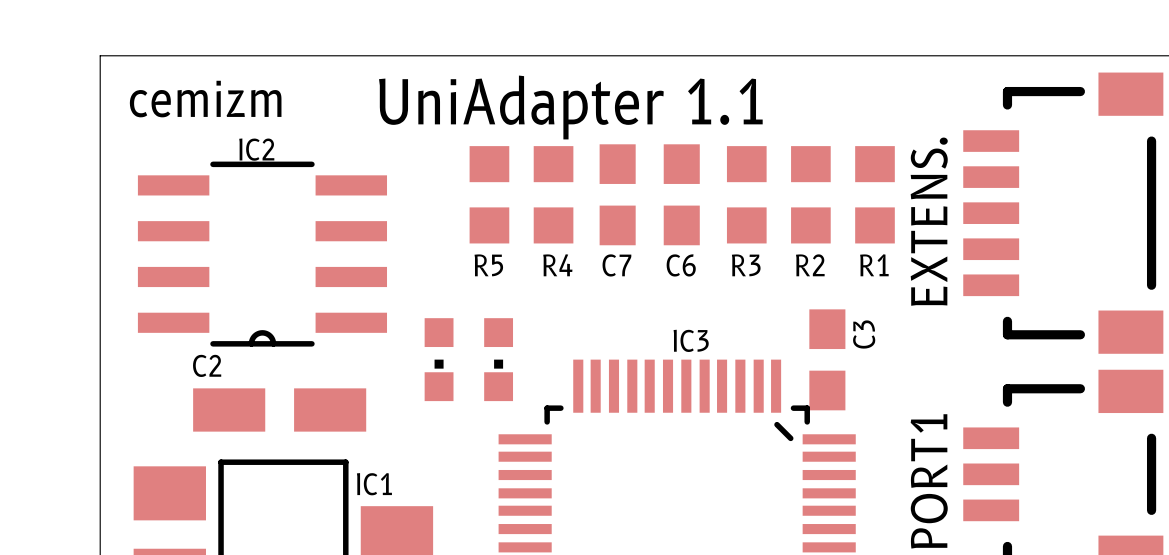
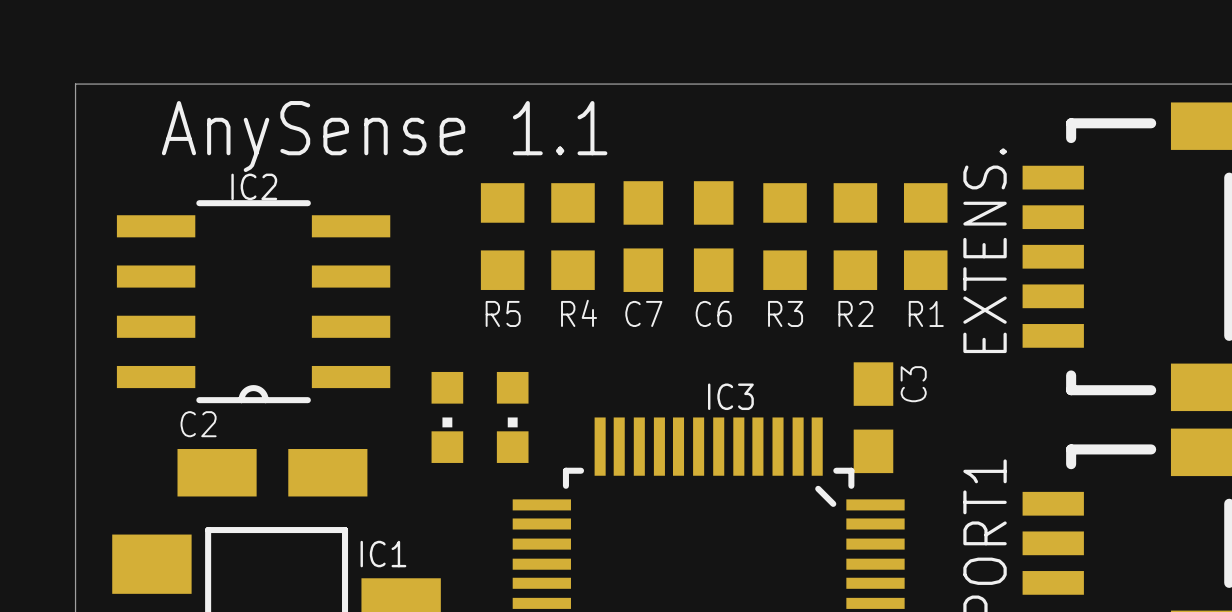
text: cemizm (205, 99) -> none
text: none -> AnySense 1.1 (384, 136)
text: UniAdapter 1.1 (570, 107) -> none

